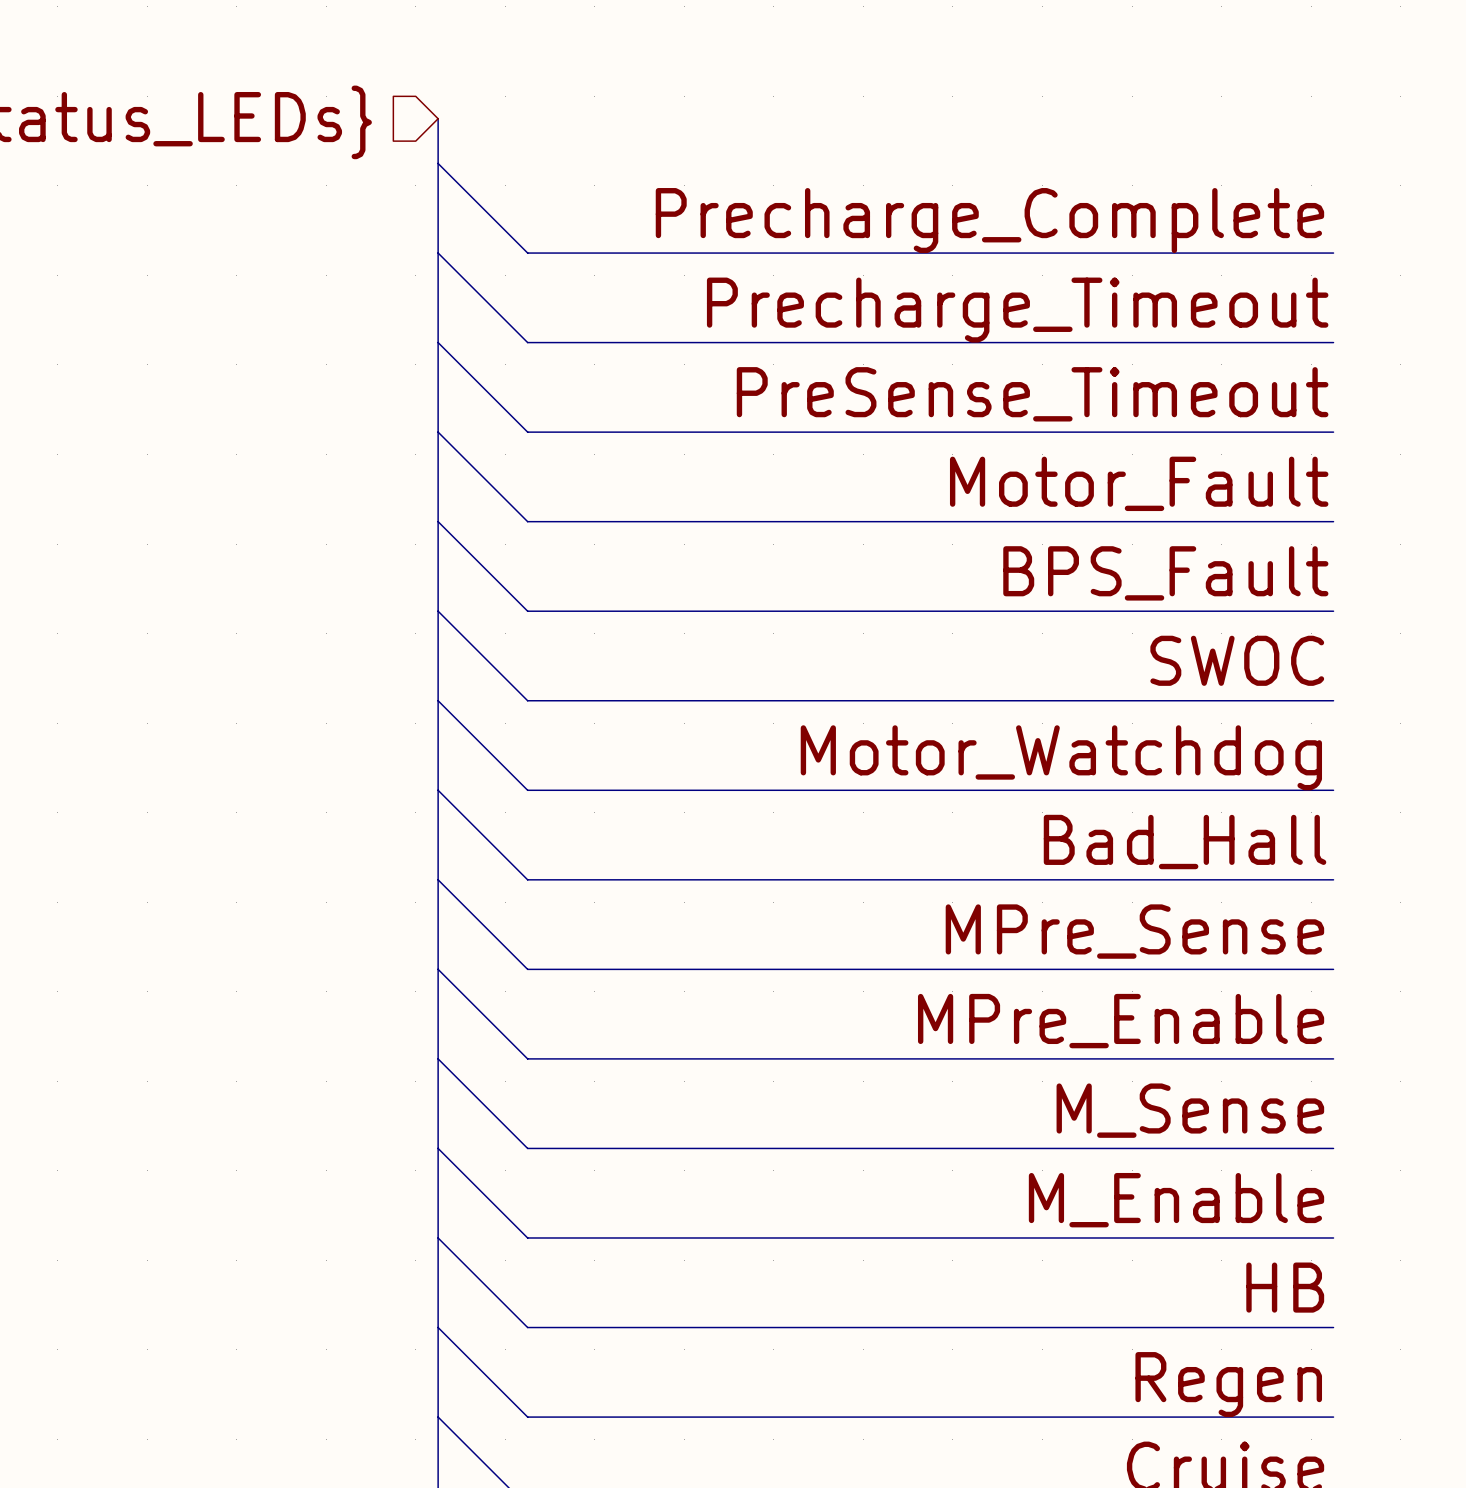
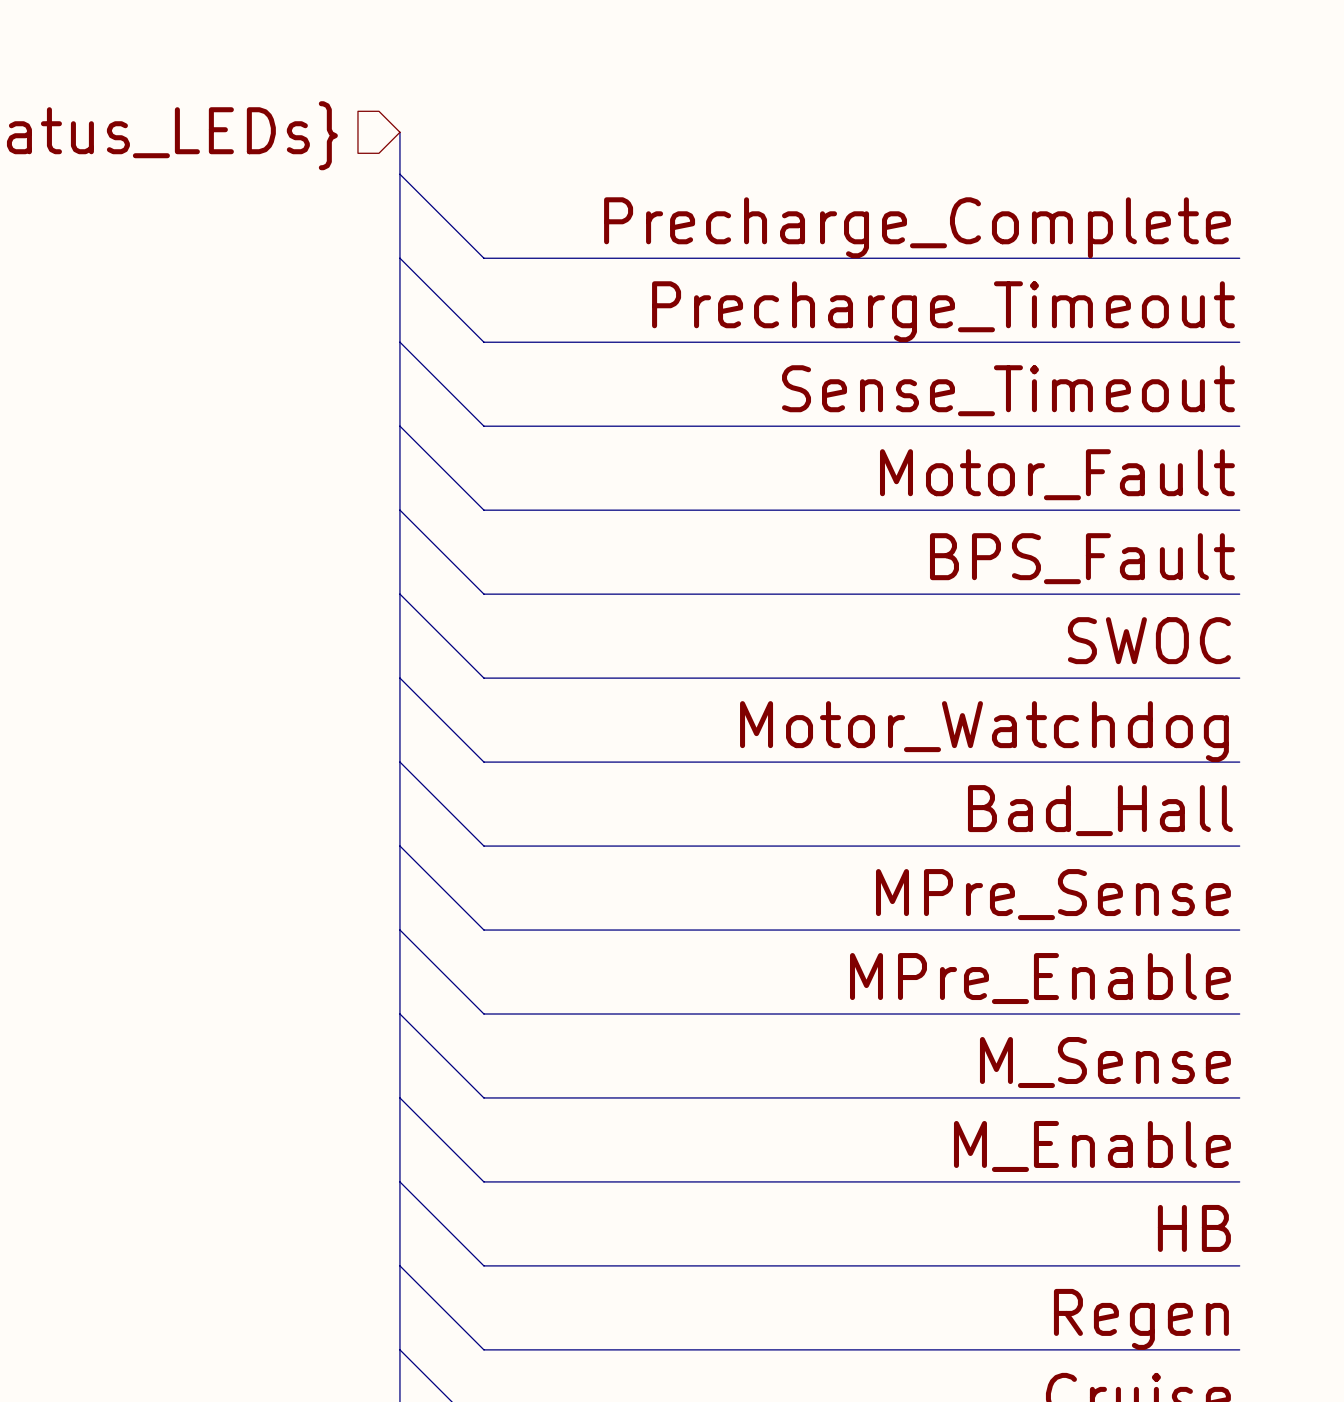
label: PreSense_Timeout (1032, 394) -> Sense_Timeout (1008, 390)

